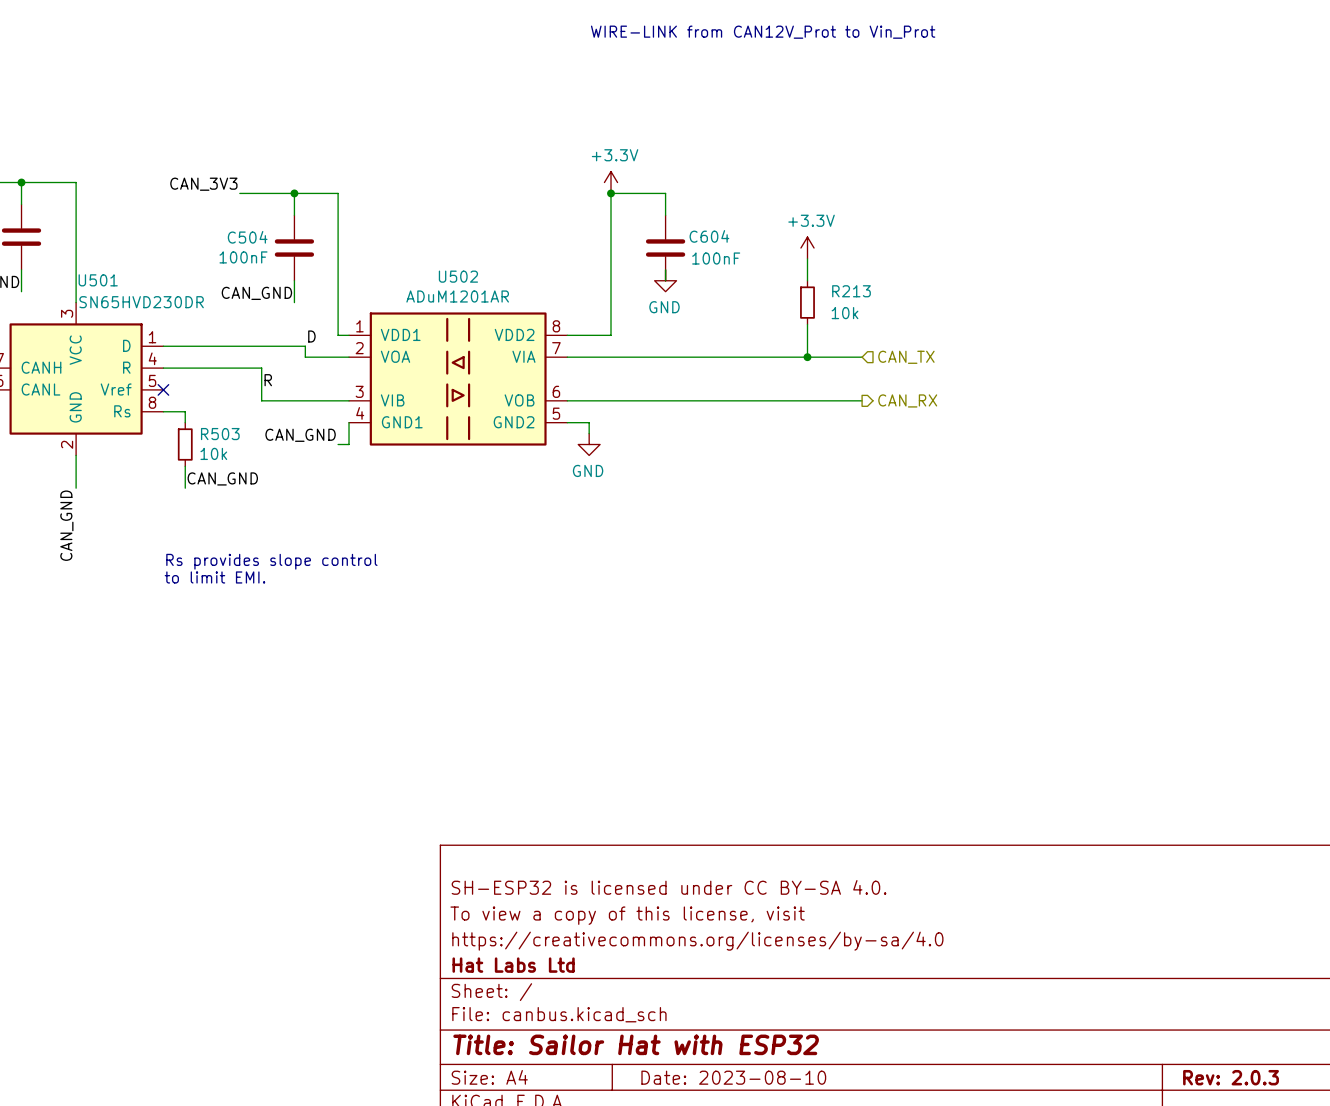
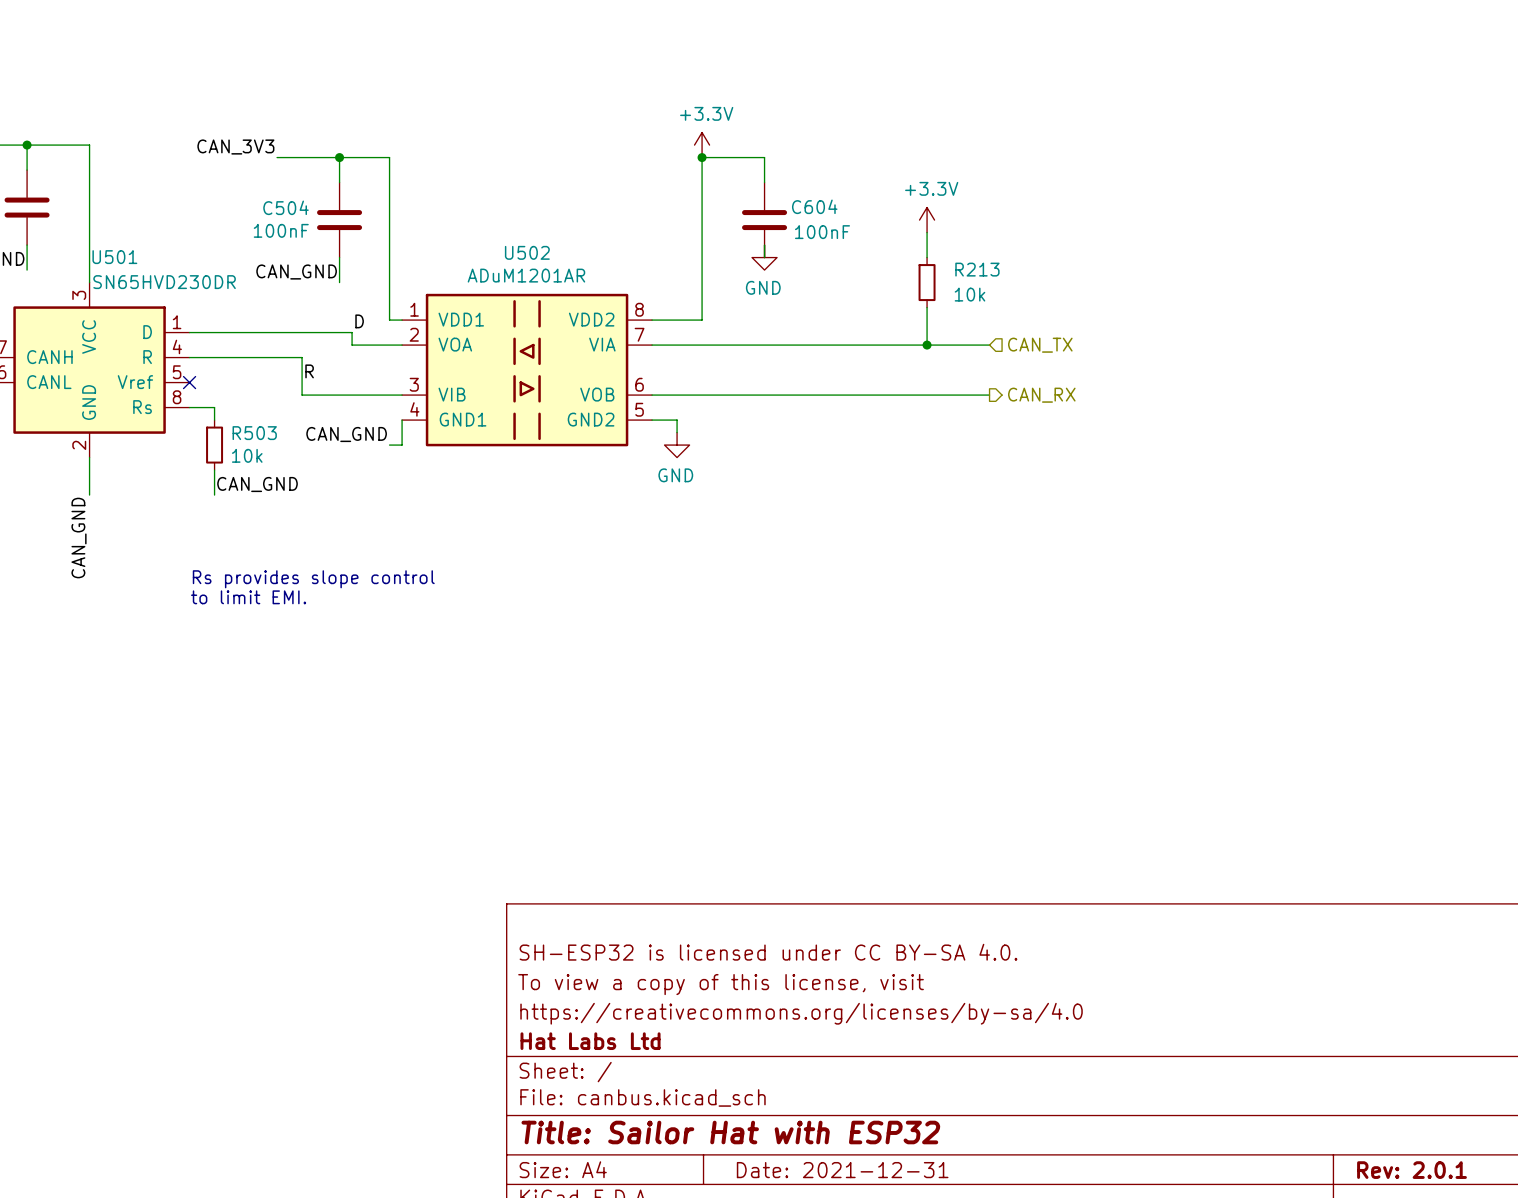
title block: Date: 2023-08-10 (733, 1077) -> Date: 2021-12-31 (842, 1170)
title block: Rev: 2.0.3 (1231, 1077) -> Rev: 2.0.1 (1412, 1170)

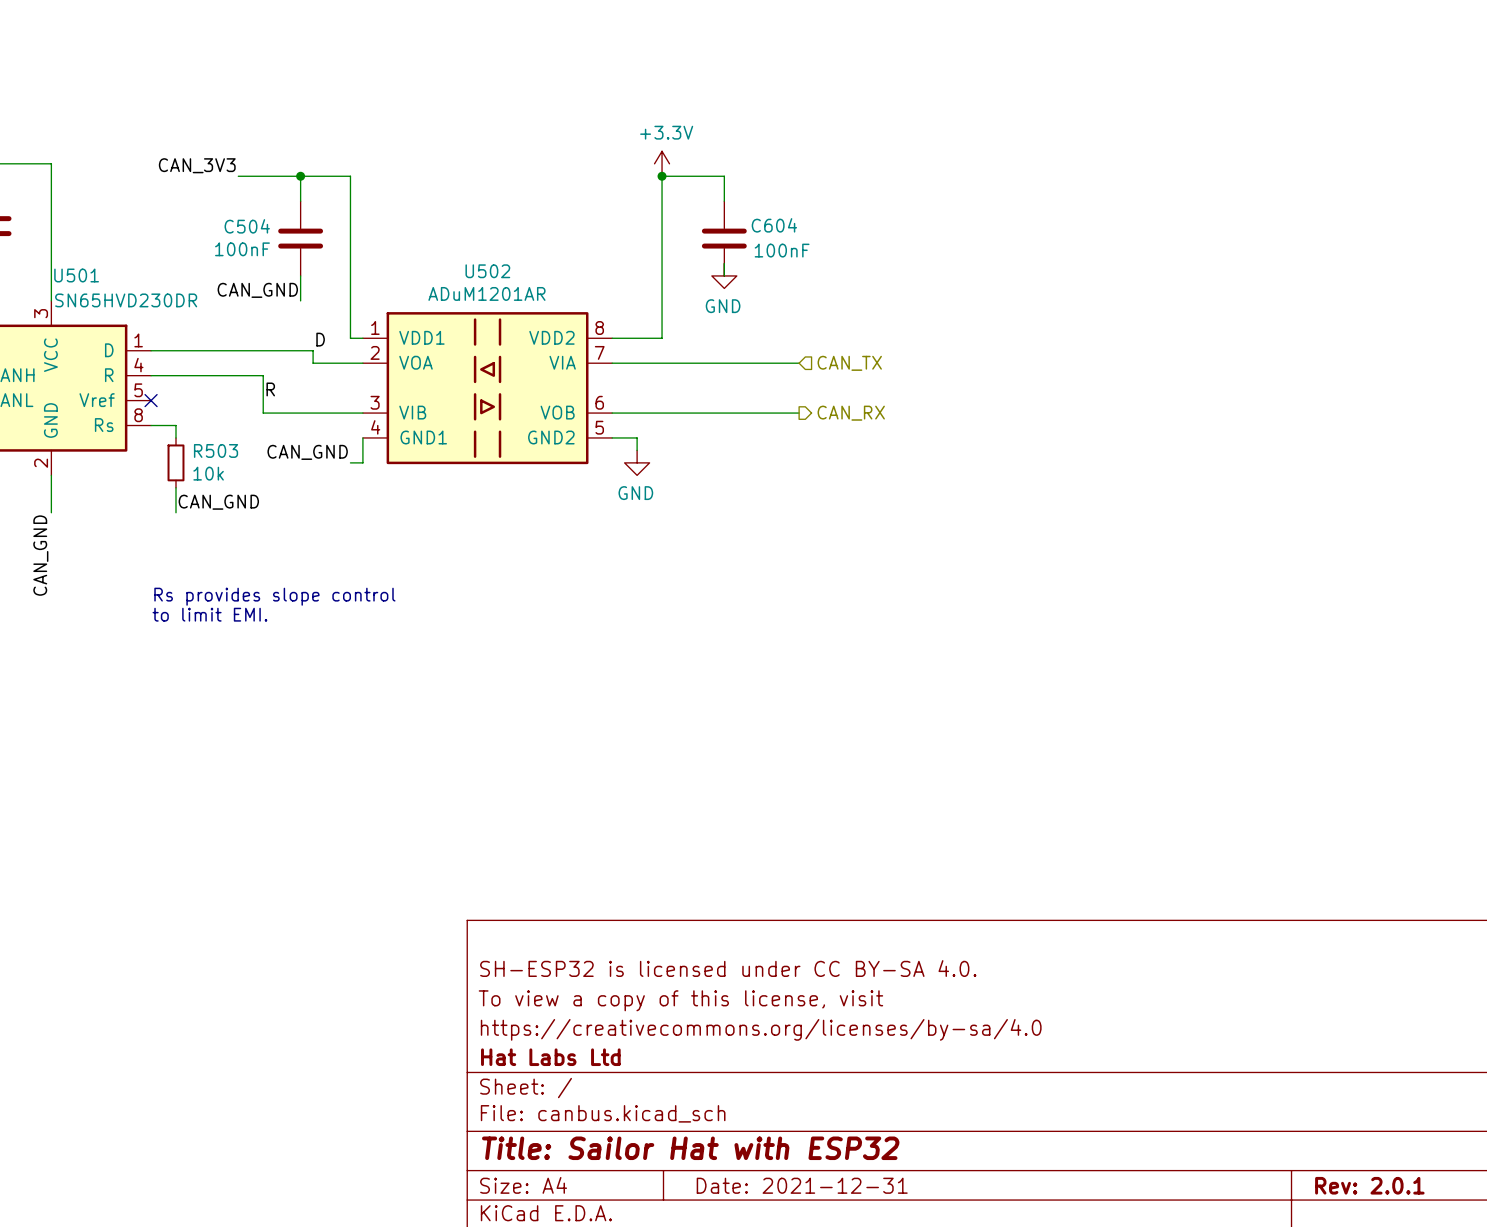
power symbol: +3.3V (927, 220) -> none
wire: (927, 232) (927, 257) -> none
R213: 10k (927, 282) -> none
wire: (927, 307) (927, 345) -> none
wire: (839, 345) (989, 345) -> none
junction: (927, 345) -> none
hierarchical label position: CAN_TX (1040, 345) -> CAN_TX (849, 363)
wire: (839, 395) (989, 395) -> none
hierarchical label position: CAN_RX (1041, 395) -> CAN_RX (851, 413)

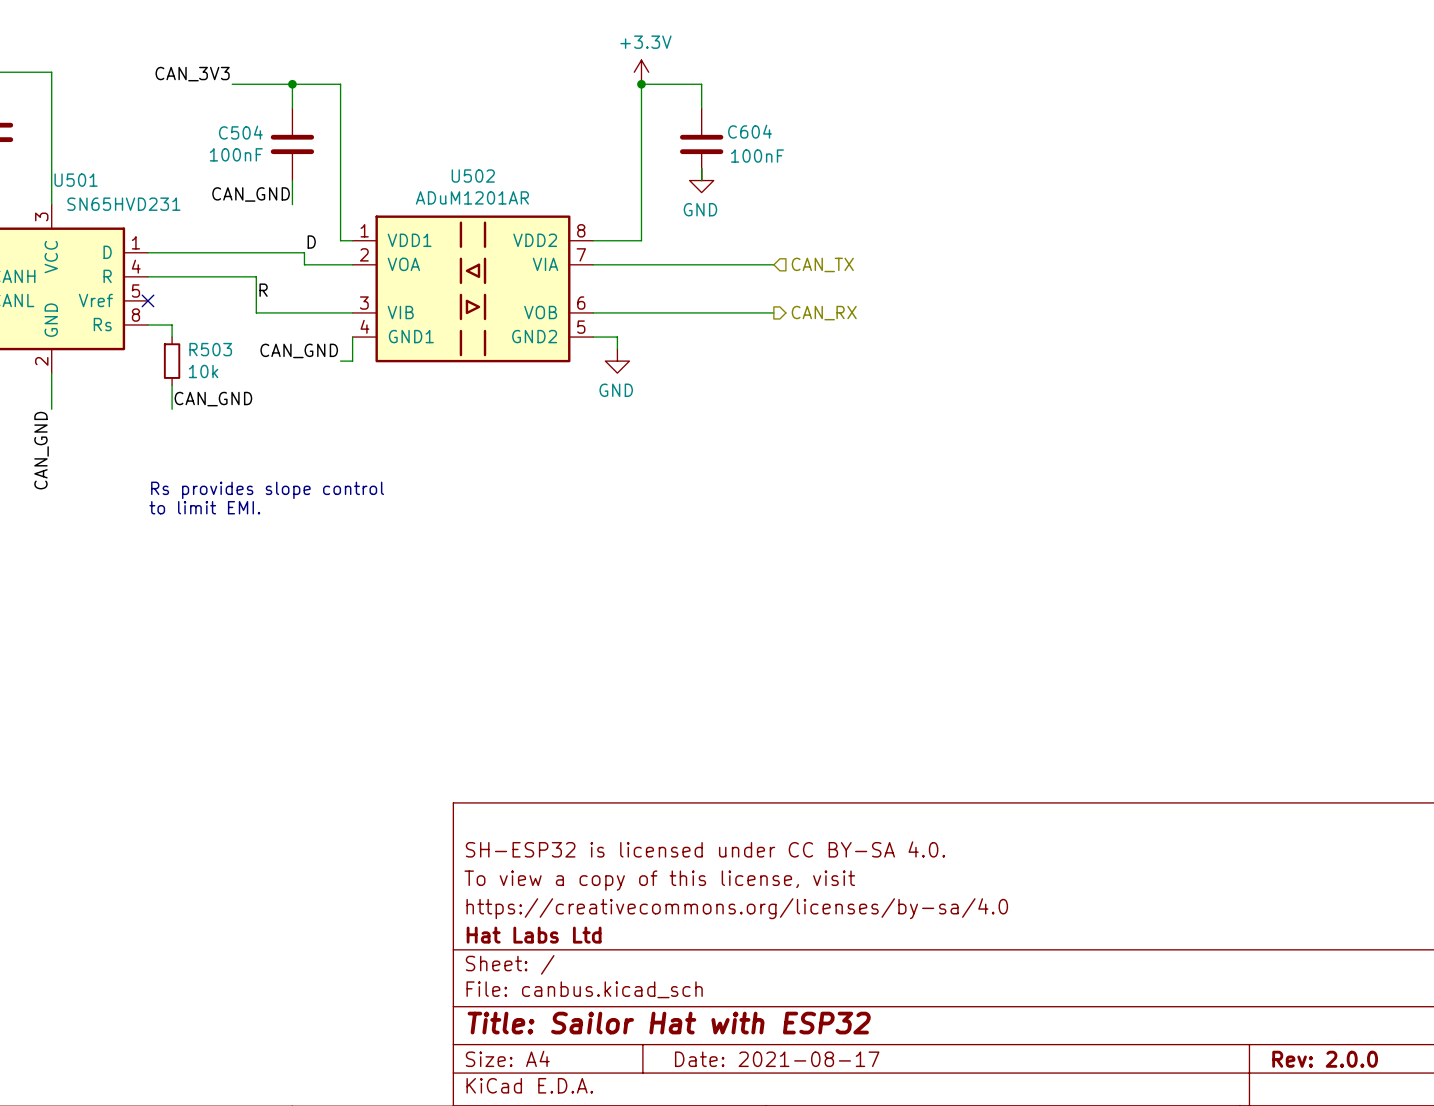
U501 value: SN65HVD230DR (126, 300) -> SN65HVD231 (123, 204)
title block: Date: 2021-12-31 (802, 1185) -> Date: 2021-08-17 (777, 1059)
title block: Rev: 2.0.1 (1369, 1185) -> Rev: 2.0.0 (1325, 1059)

